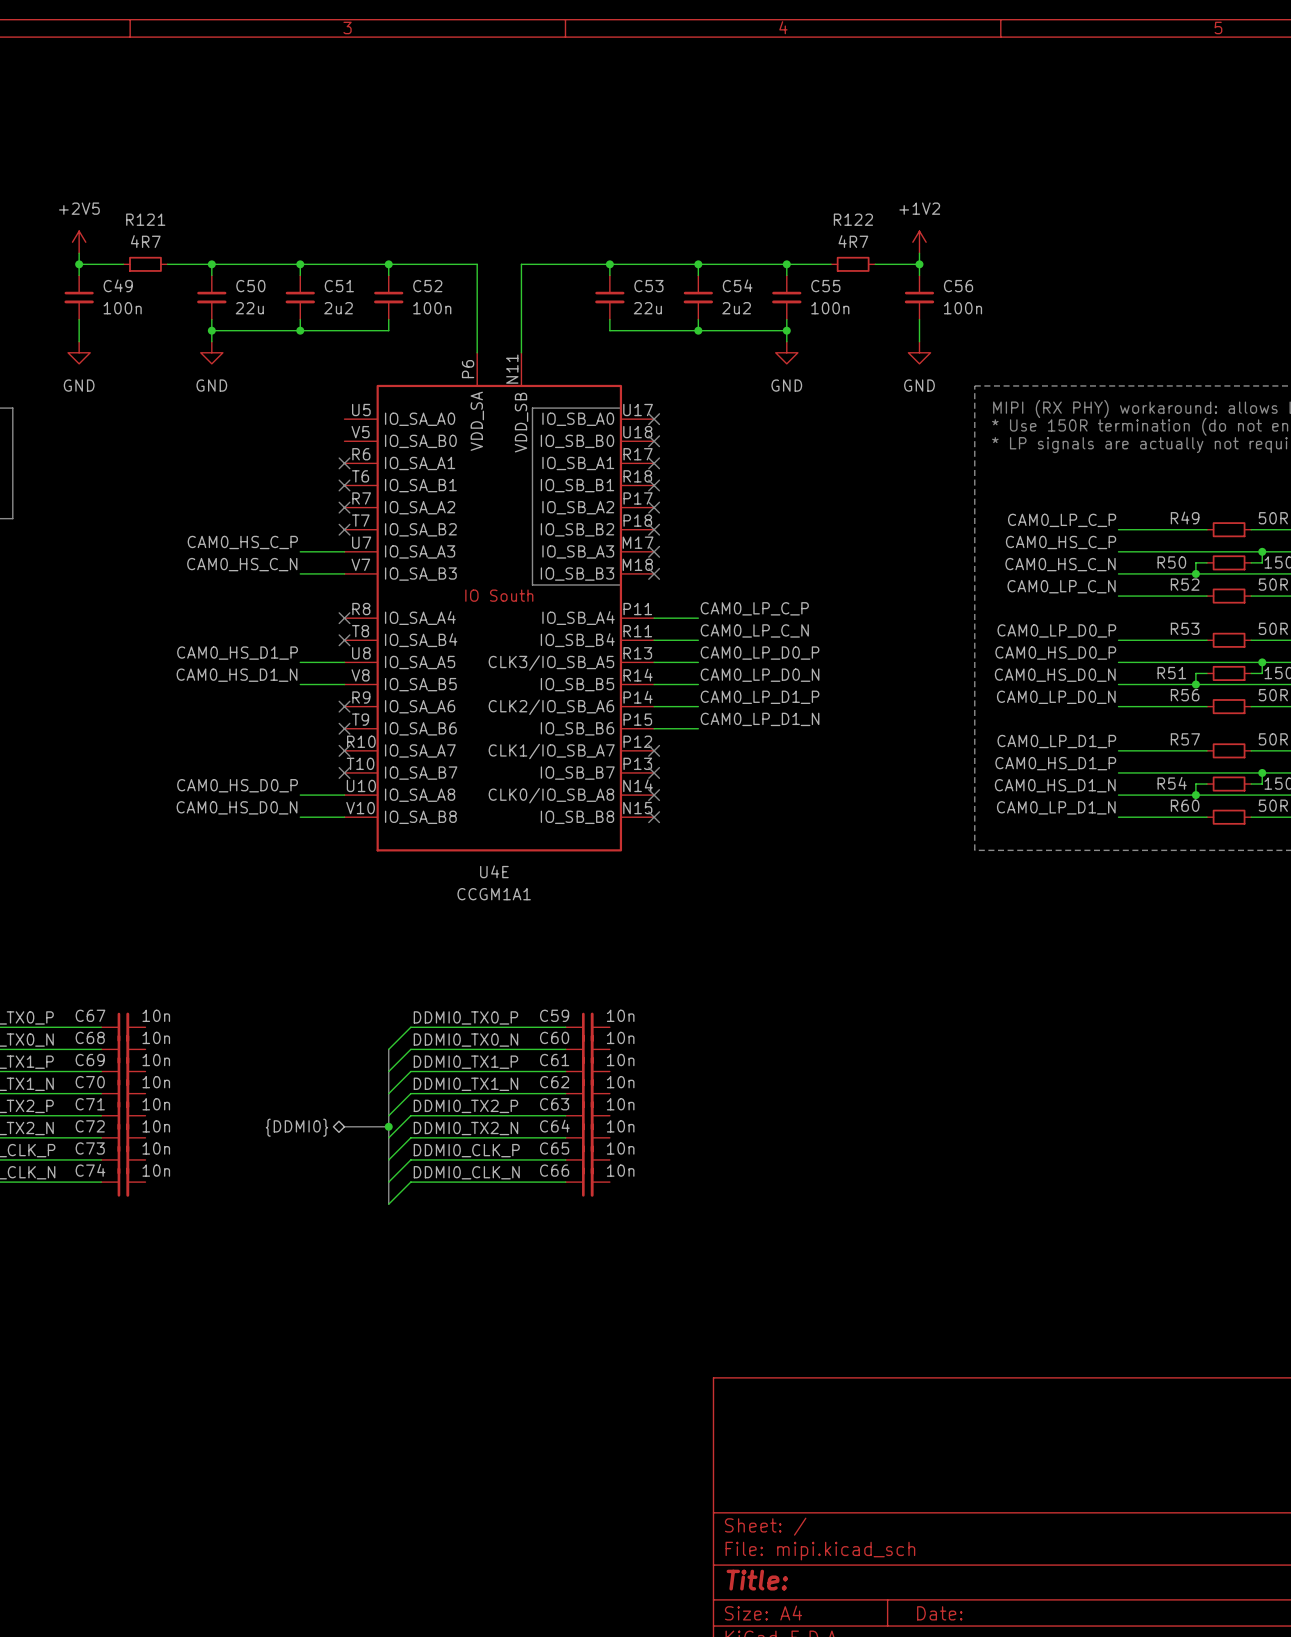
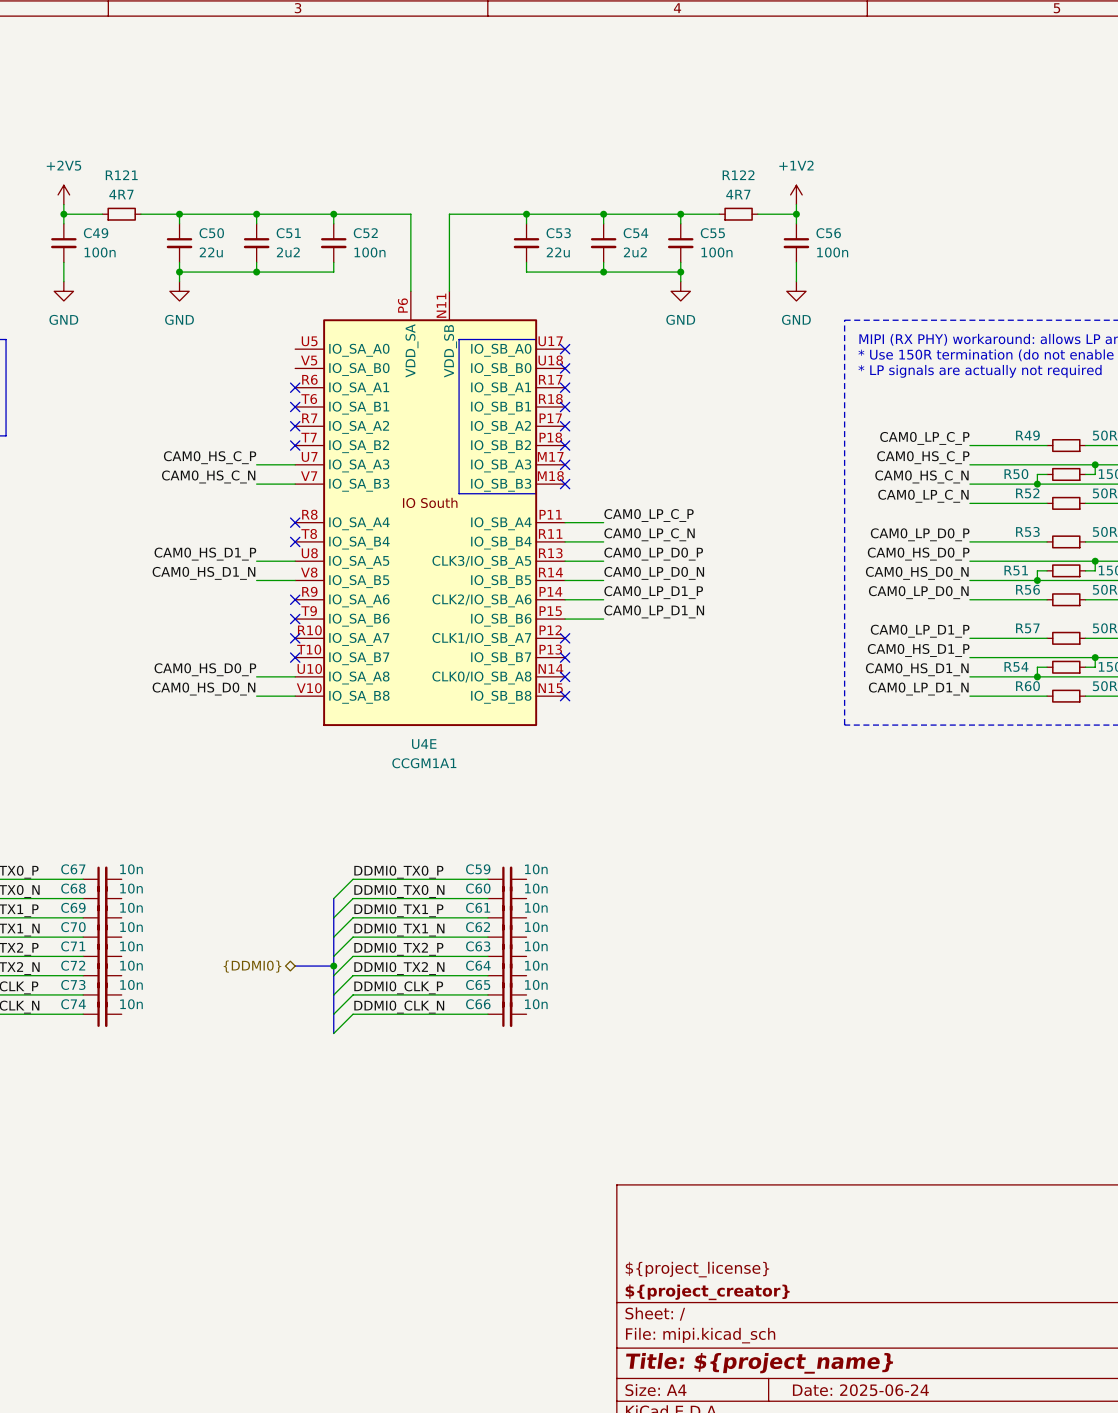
title block: none -> ${project_license} (697, 1269)
title block: none -> ${project_creator} (707, 1292)
title block: Title: (757, 1580) -> Title: ${project_name} (759, 1363)
title block: Date: (939, 1613) -> Date: 2025-06-24 (860, 1390)

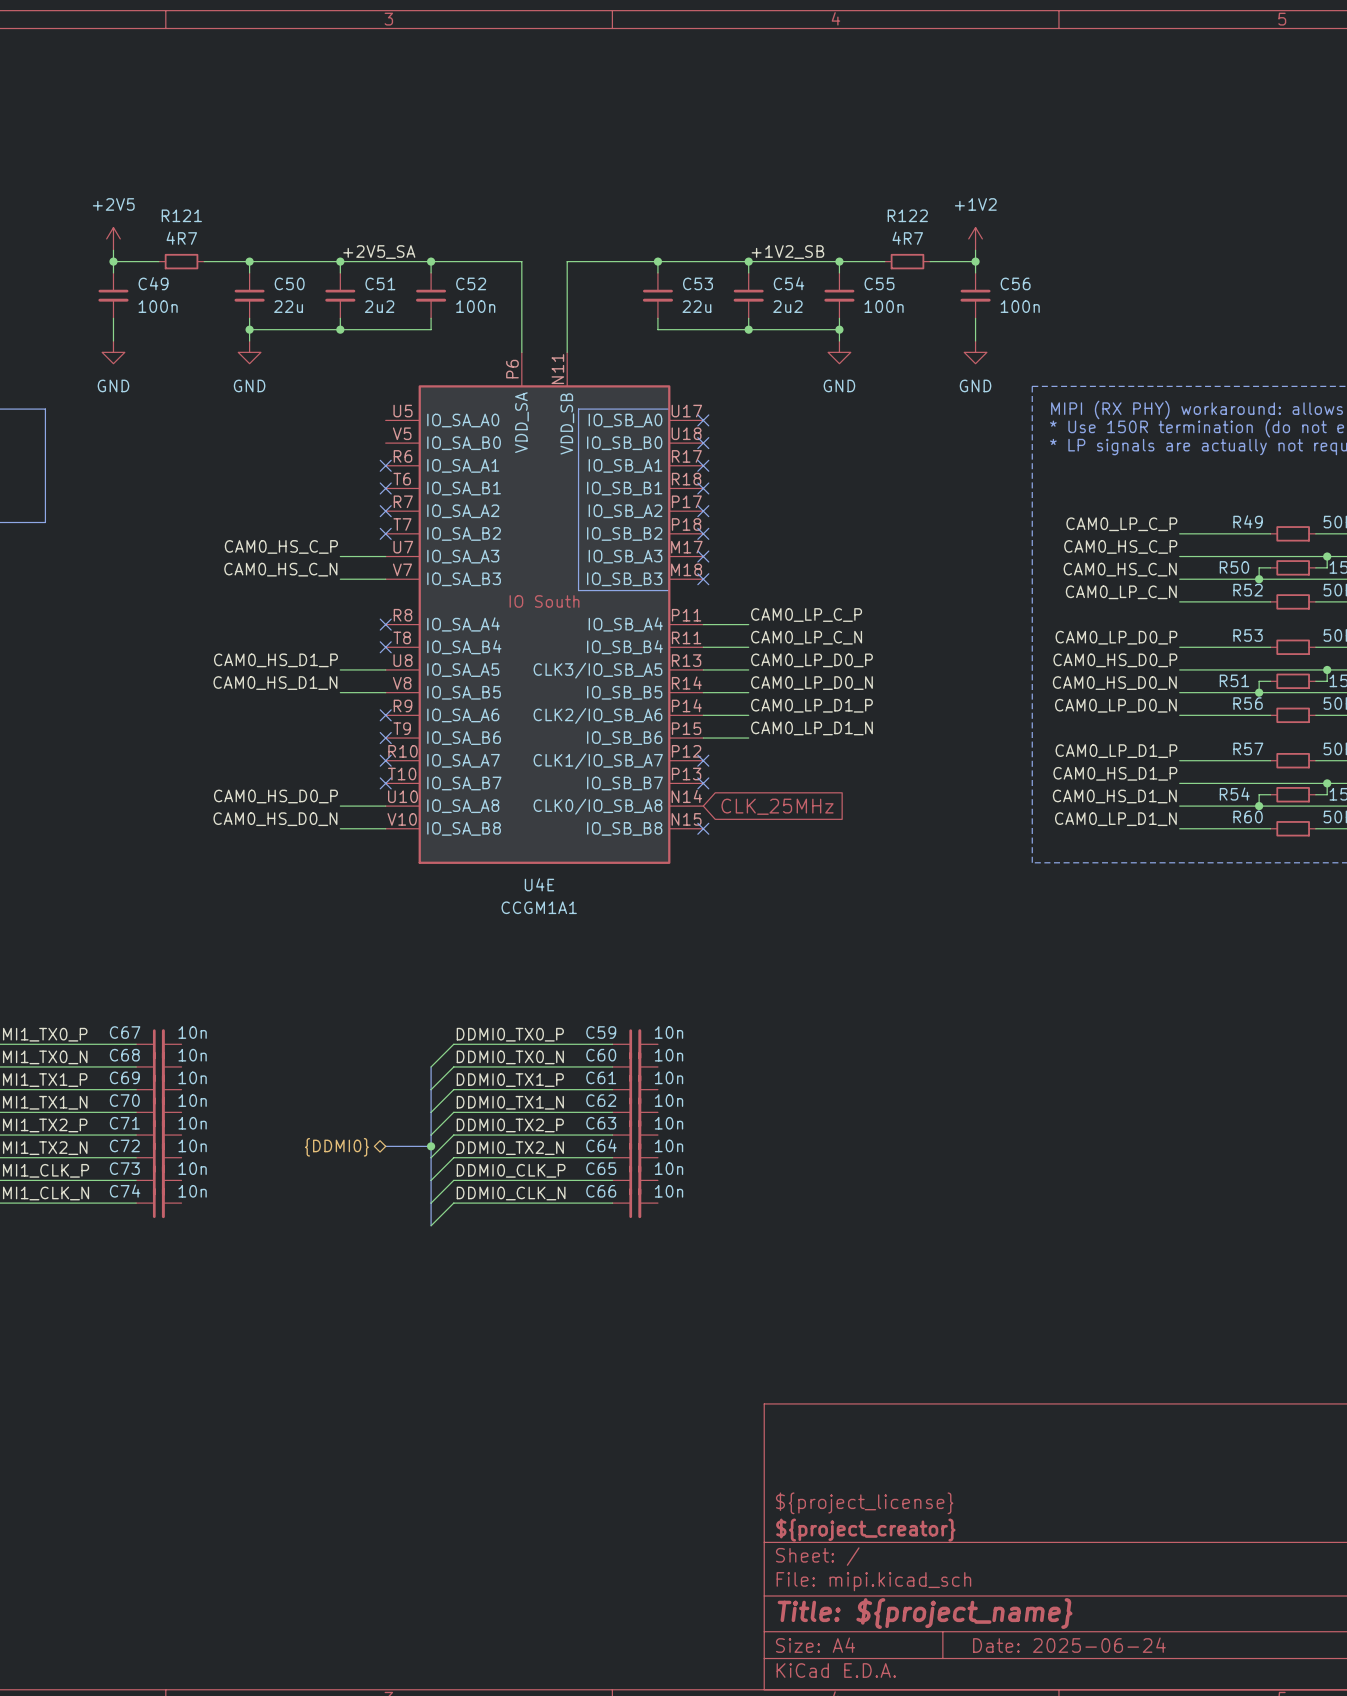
label: none -> +2V5_SA (379, 252)
label: none -> +1V2_SB (787, 252)
no-connect mark: (565, 676) -> none
global label: none -> CLK_25MHz (777, 806)

